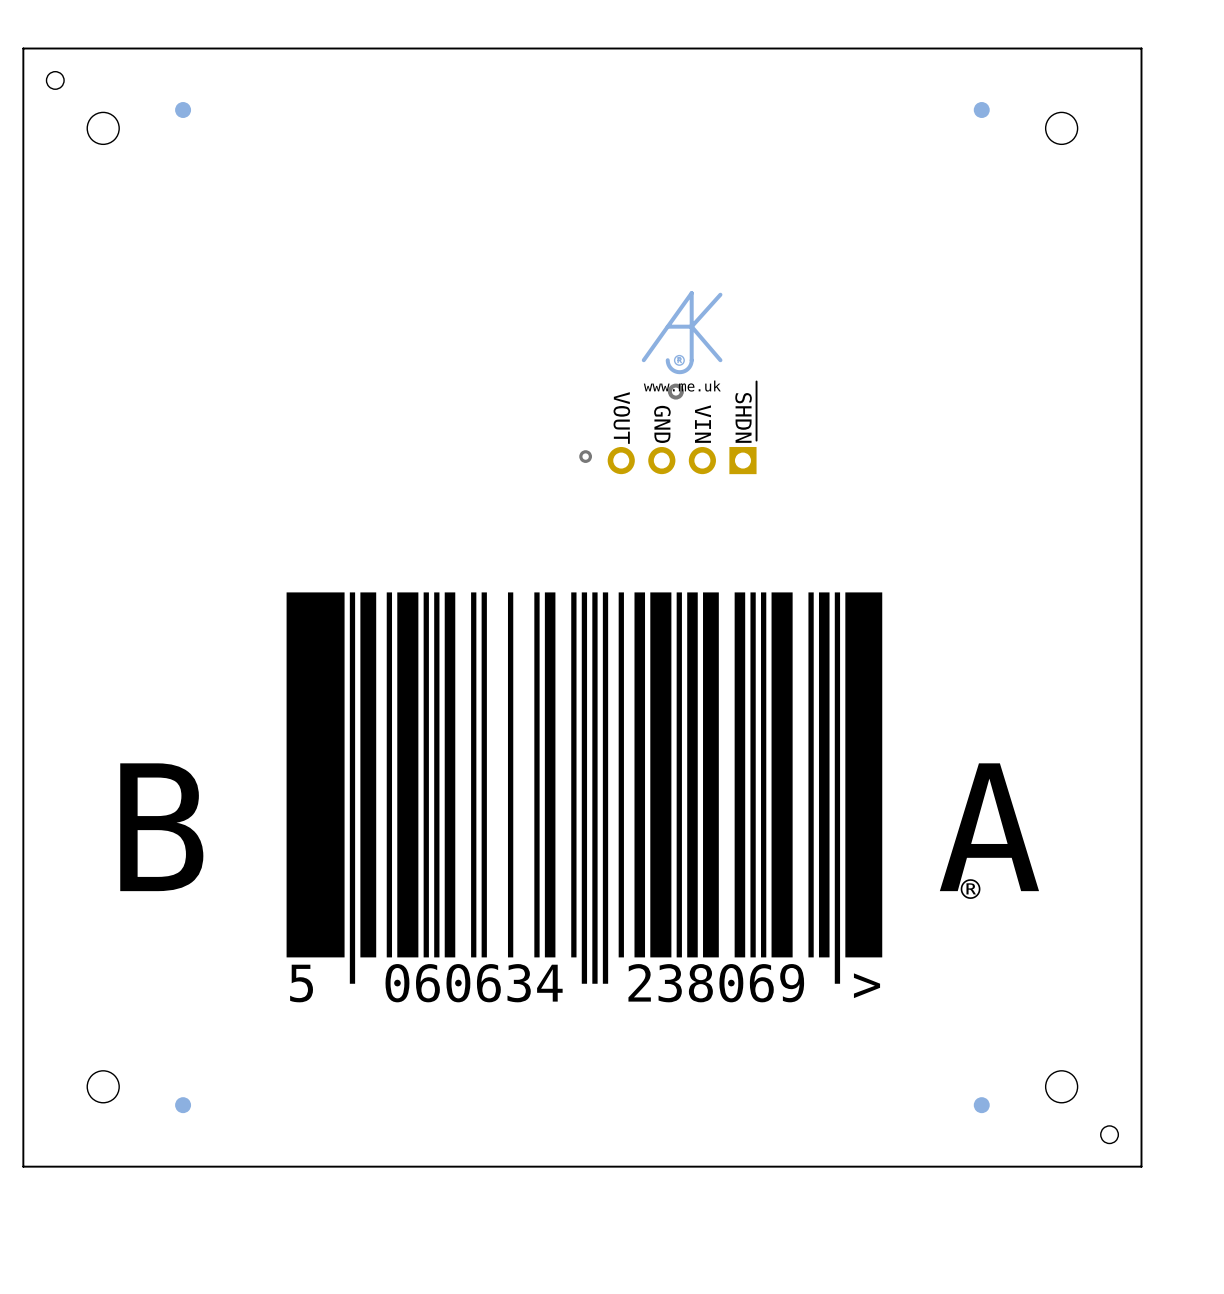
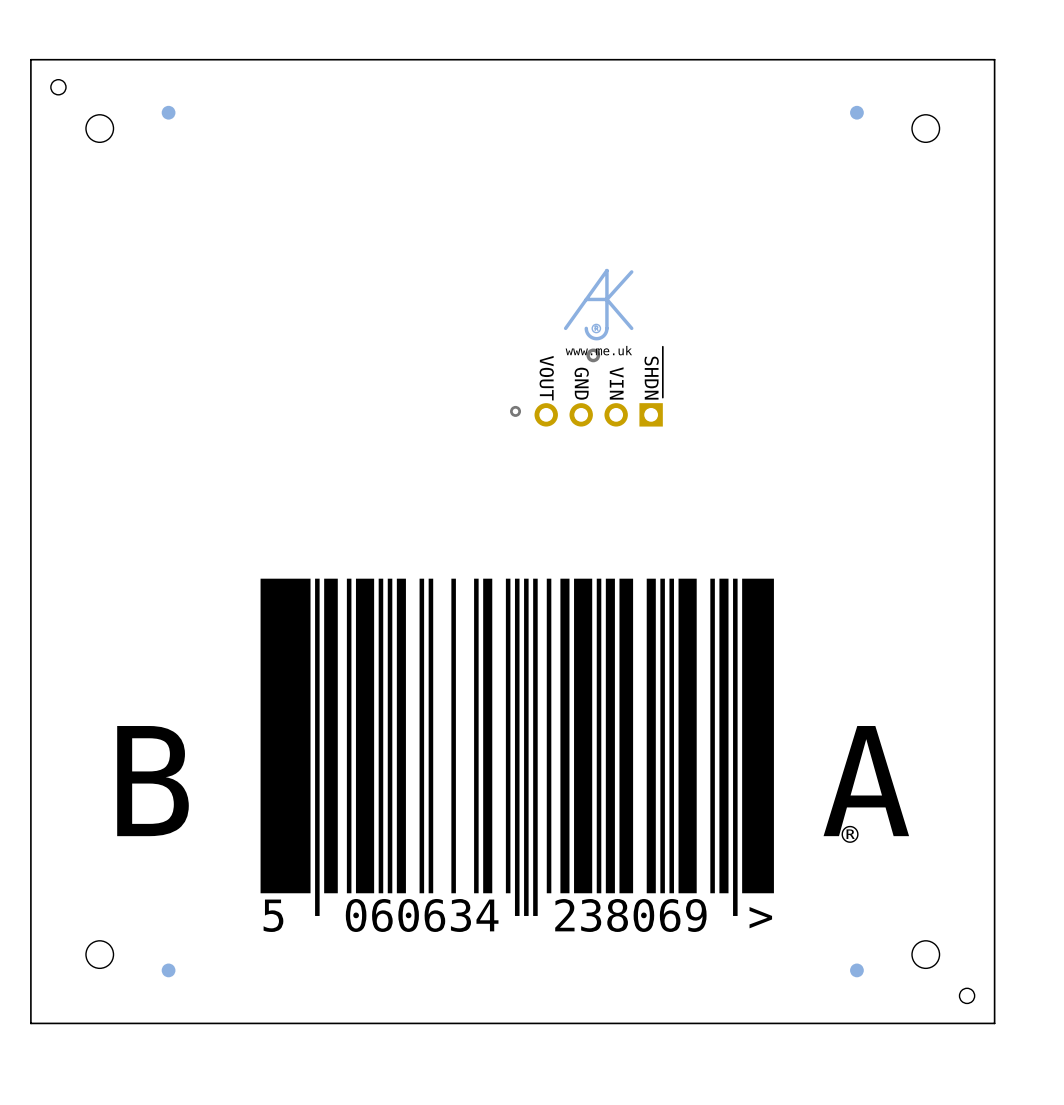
drawing position: (584, 788) -> (517, 747)
text position: B (161, 827) -> B (153, 781)
text position: A (989, 827) -> A (866, 781)
text position: ® (970, 889) -> ® (850, 834)

